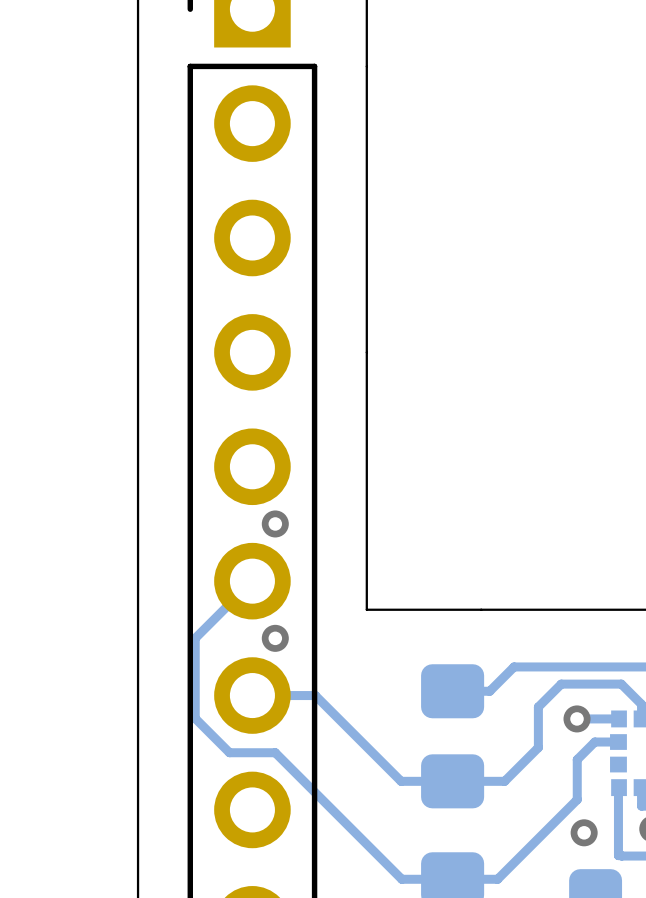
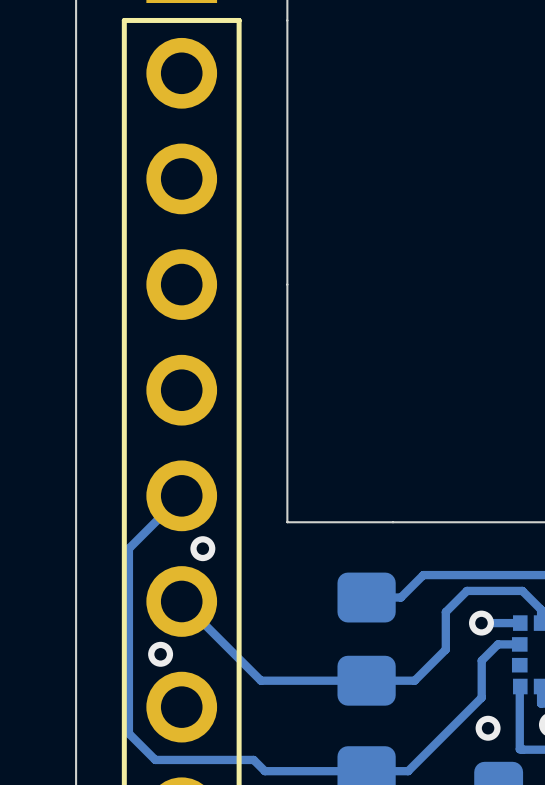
via position: (275, 523) -> (160, 654)
bottom track: (252, 695) (315, 695) (401, 781) -> (181, 601) (260, 680) (319, 680)
bottom track: (195, 718) (229, 752) (275, 752) (401, 879) -> (128, 622) (128, 733) (155, 759) (253, 759) (264, 771) (319, 771)

